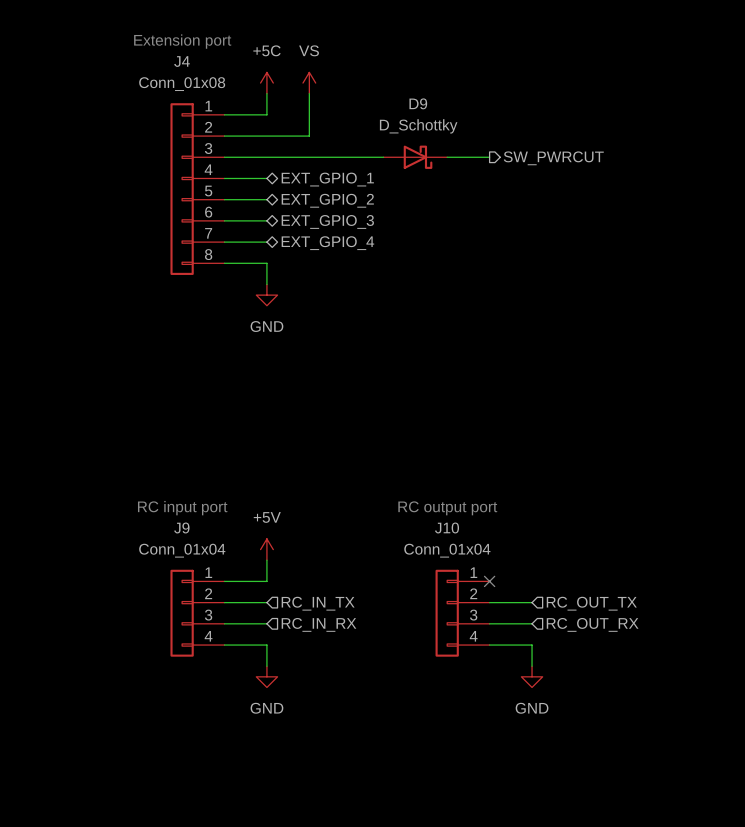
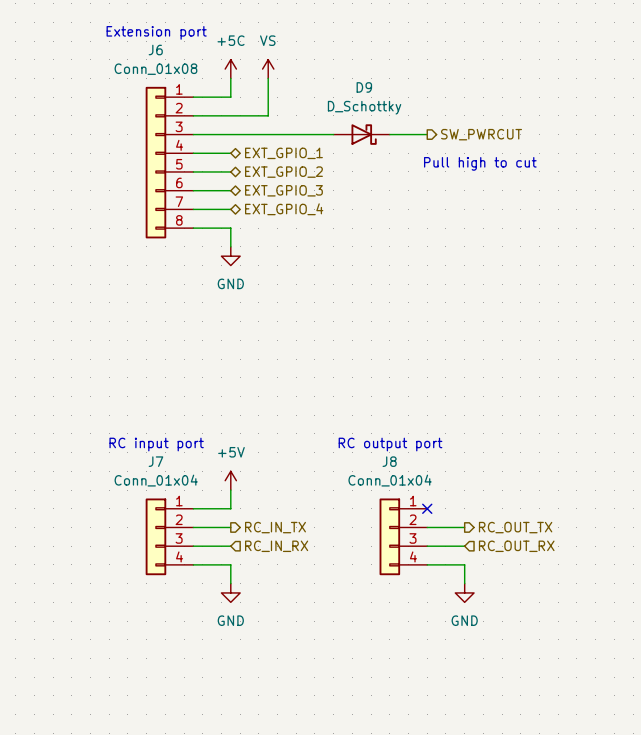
J4 name: J4 (182, 61) -> J6 (155, 50)
text: none -> Pull high to cut (480, 163)
J9 name: J9 (181, 527) -> J7 (155, 461)
J10 name: J10 (447, 527) -> J8 (389, 461)
hierarchical label shape: input (318, 603) -> output (275, 527)
hierarchical label shape: input (591, 603) -> output (515, 527)

